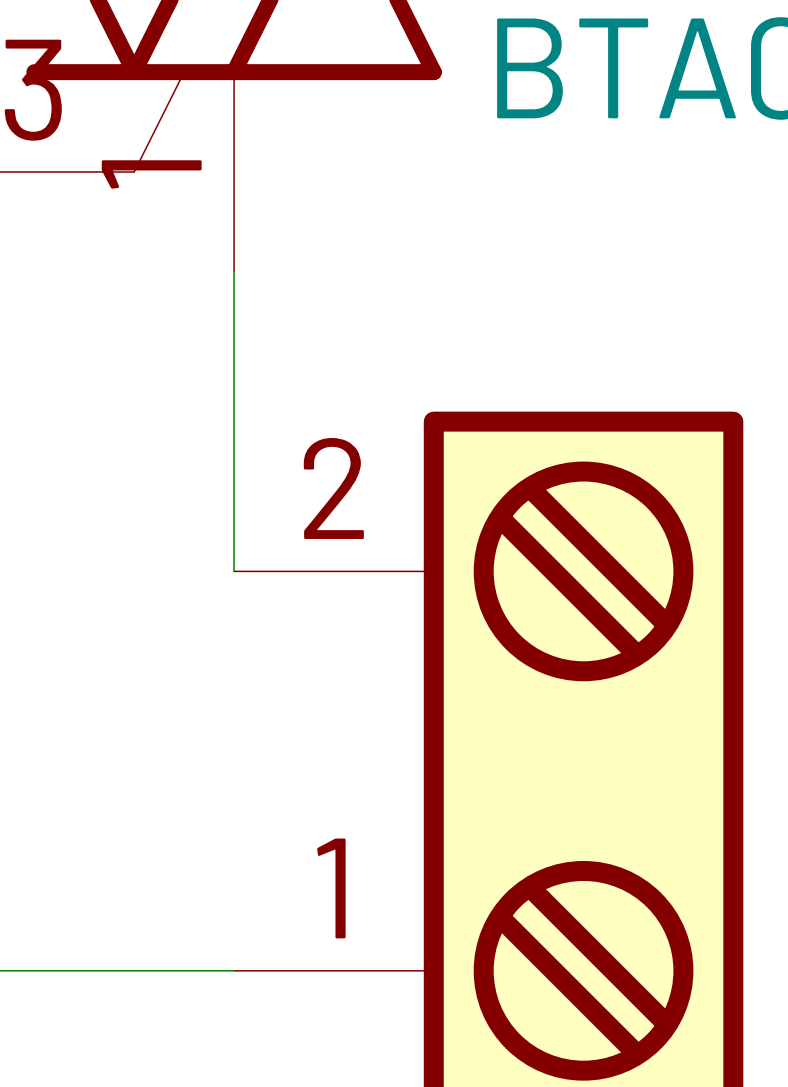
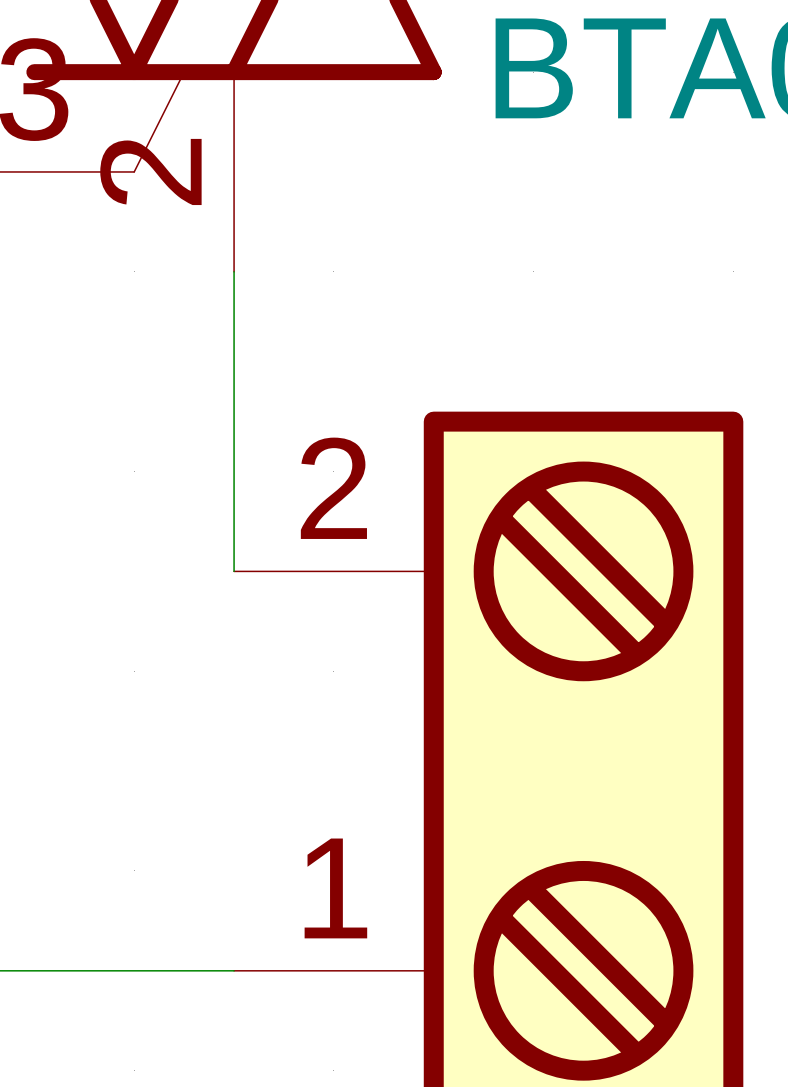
part pin number: 1 (151, 174) -> 2 (150, 171)

